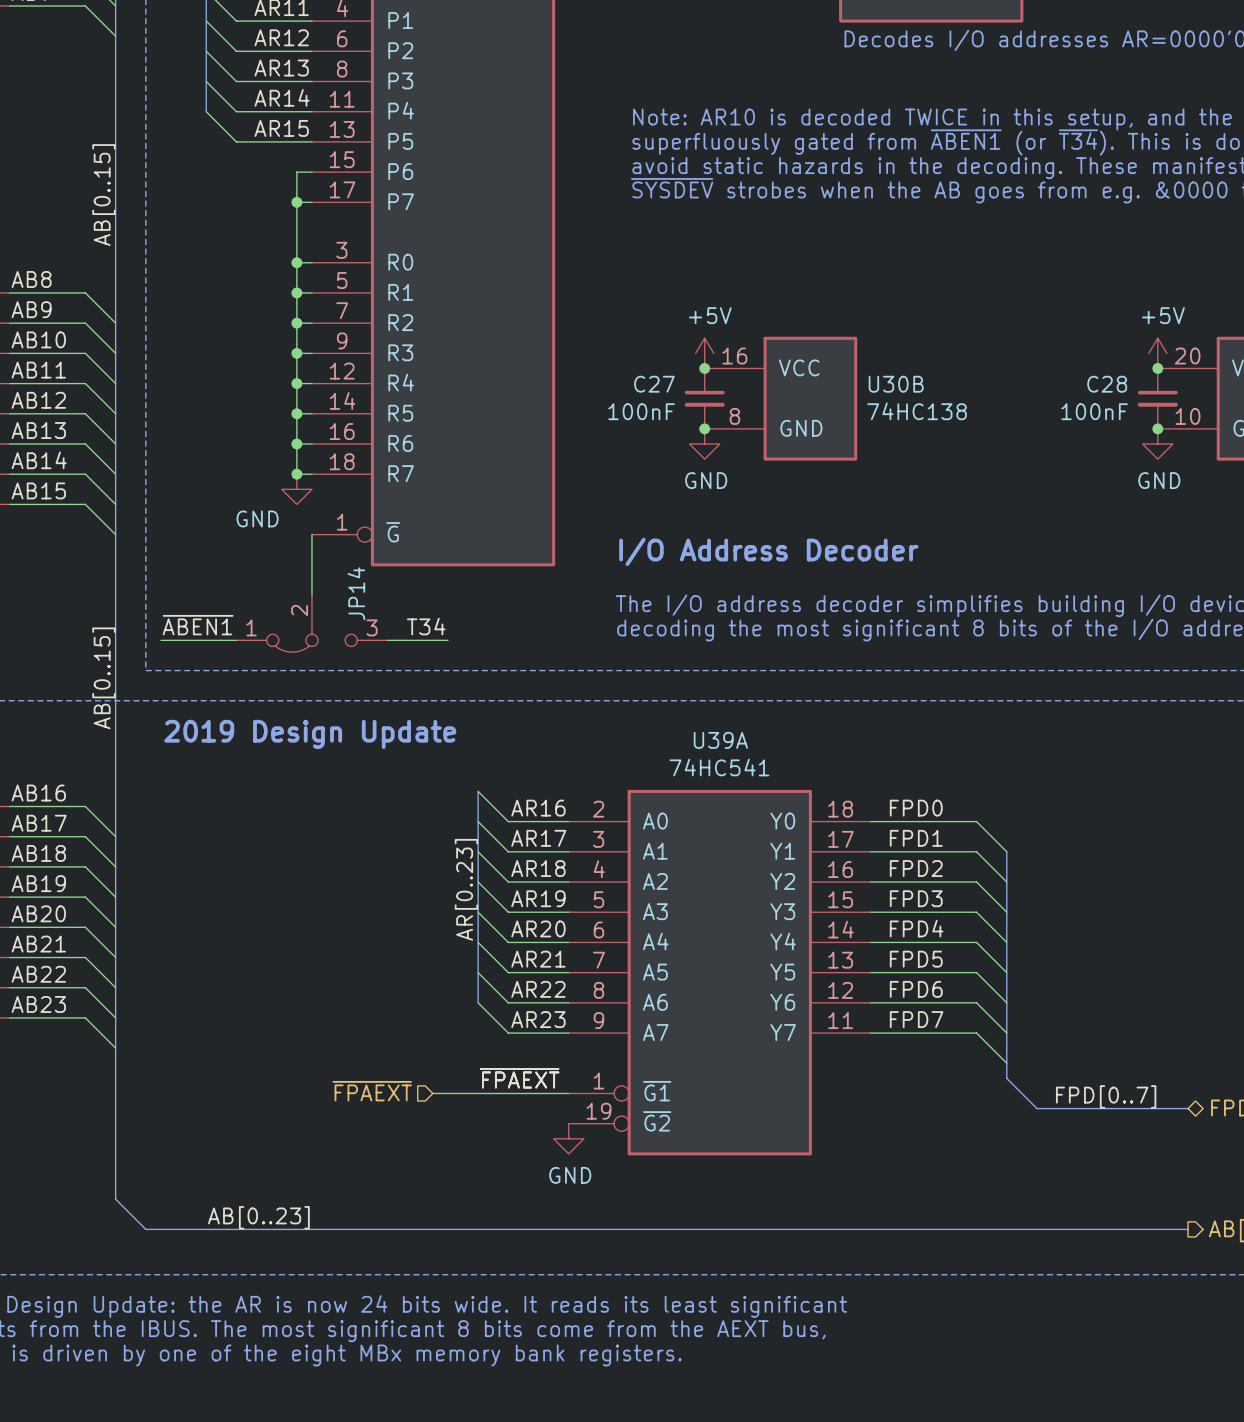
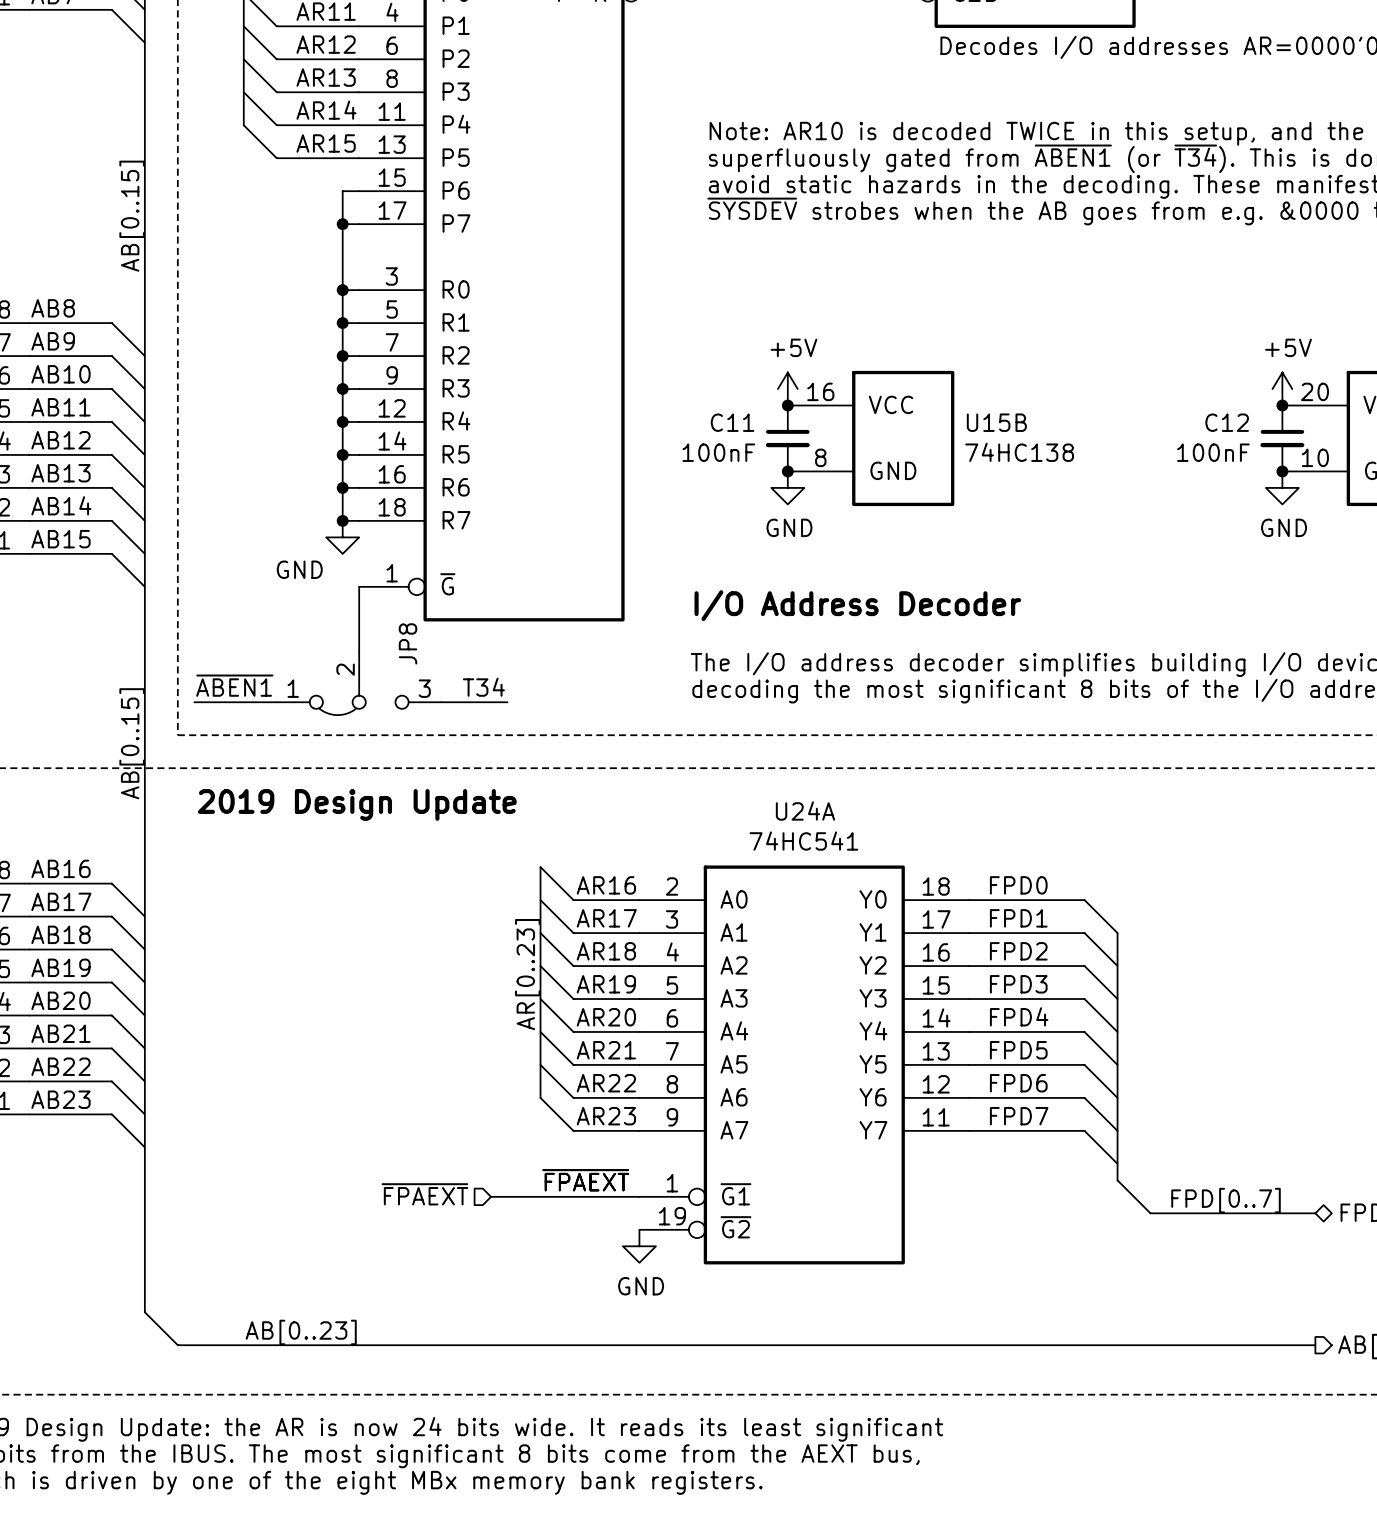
C27 name: C27 (654, 384) -> C11 (732, 422)
U30B name: U30B (896, 384) -> U15B (996, 422)
C28 name: C28 (1107, 384) -> C12 (1227, 422)
JP14 name: JP14 (356, 593) -> JP8 (408, 643)
U39A name: U39A (720, 740) -> U24A (805, 811)

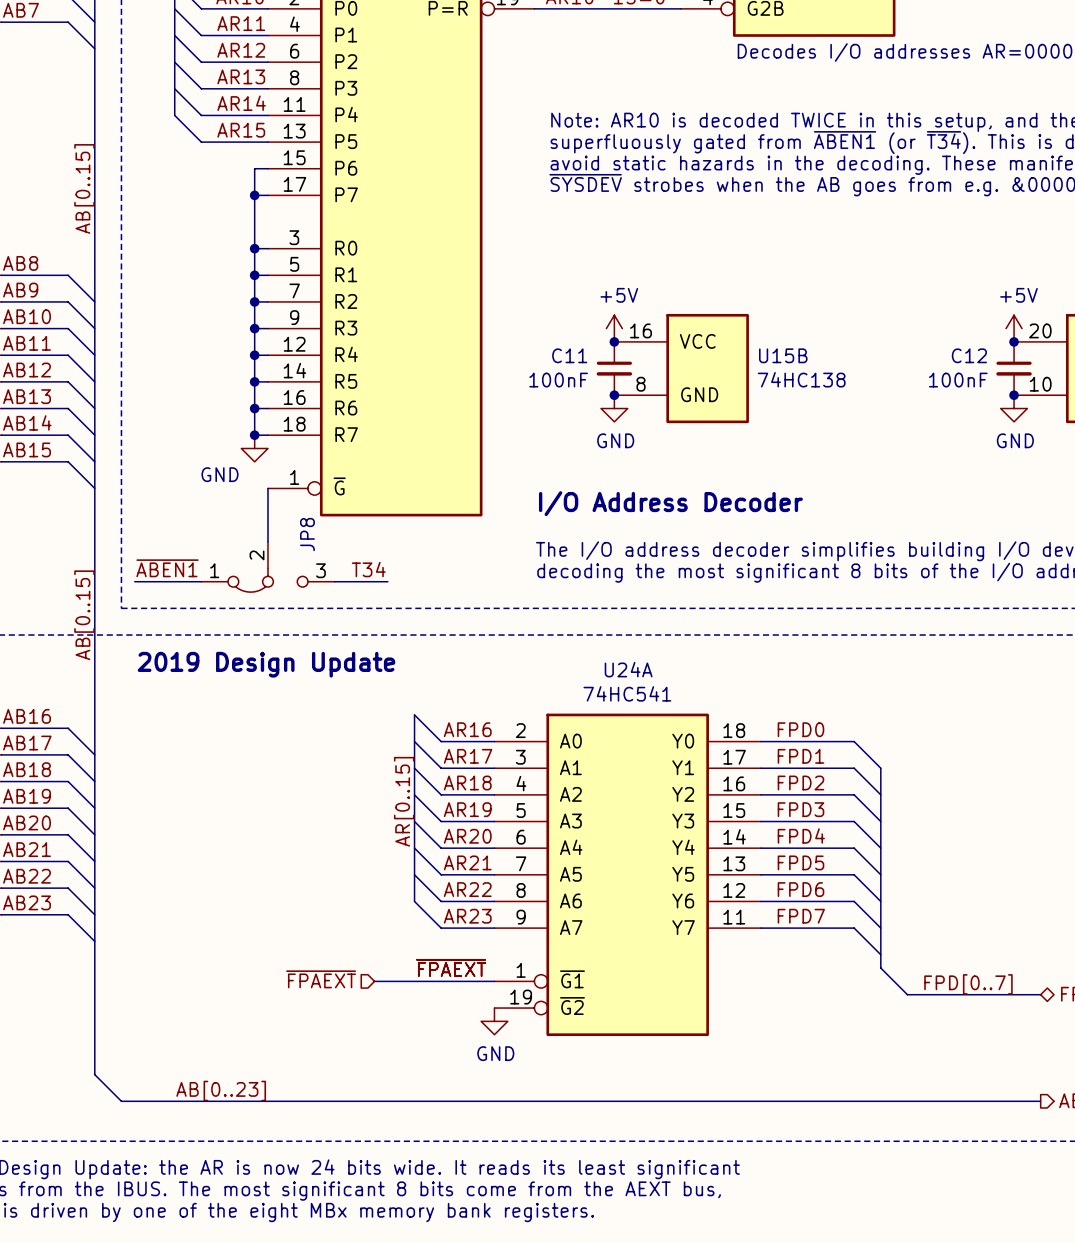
label: AR[0..23] (527, 974) -> AR[0..15] (404, 801)

